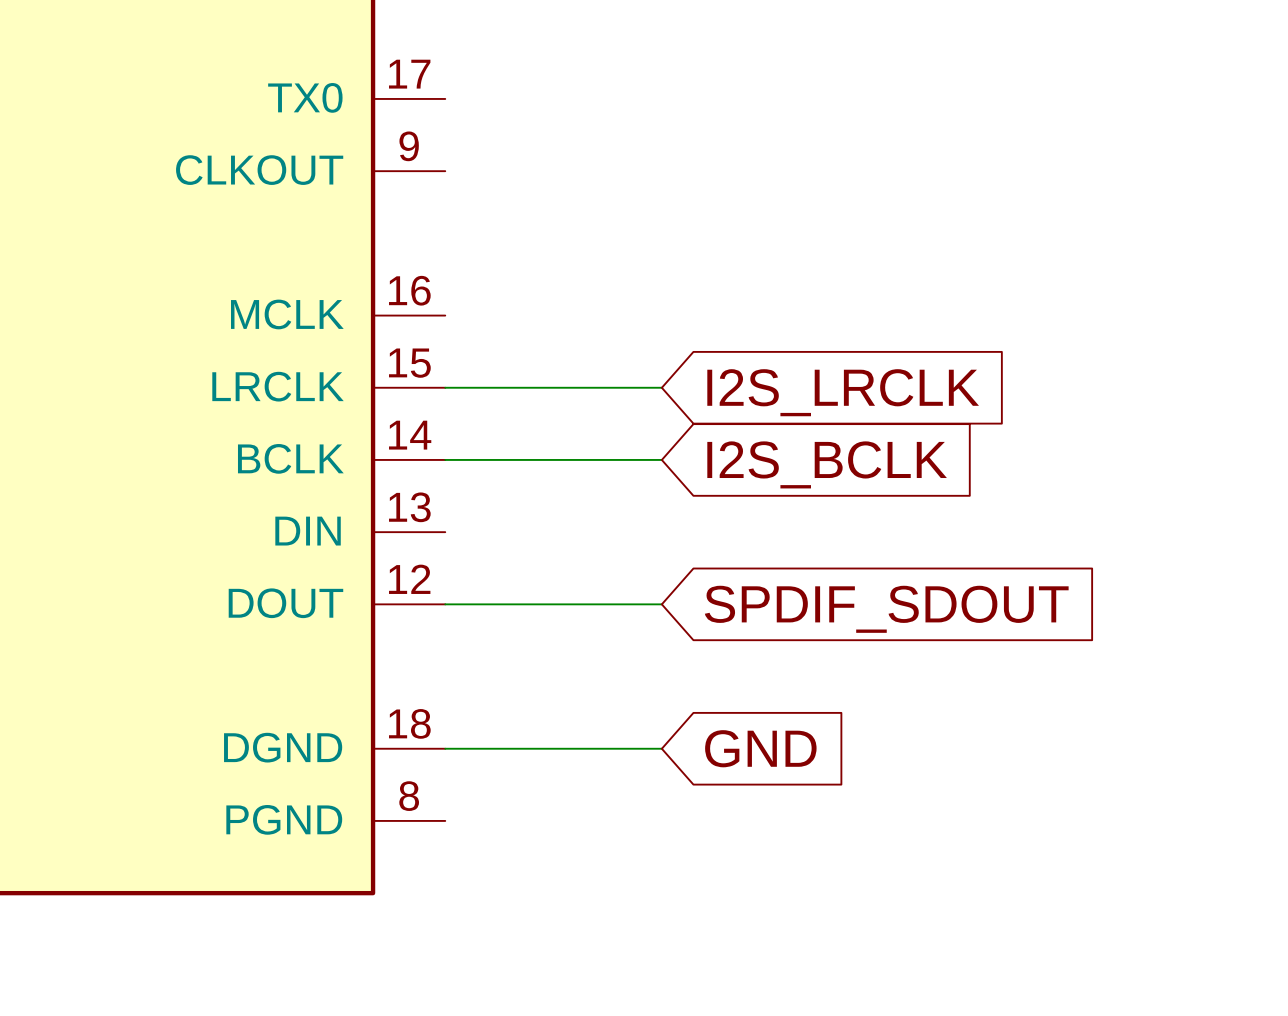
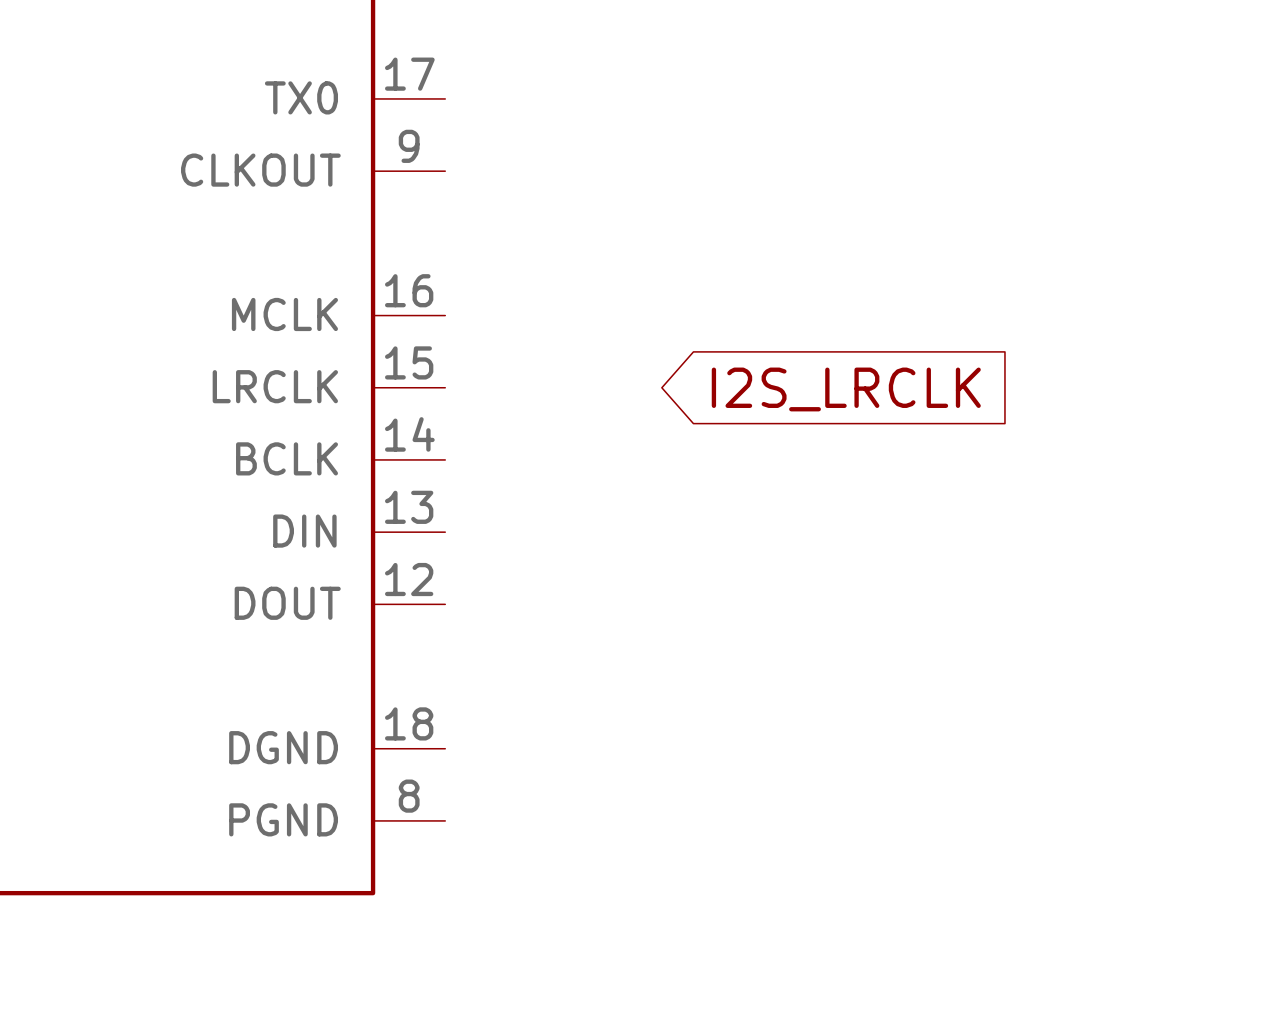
wire: (445, 387) (661, 387) -> none
wire: (445, 459) (661, 459) -> none
global label: I2S_BCLK (827, 464) -> none
wire: (445, 604) (661, 604) -> none
global label: SPDIF_SDOUT (886, 609) -> none
wire: (445, 748) (661, 748) -> none
global label: GND (760, 748) -> none

